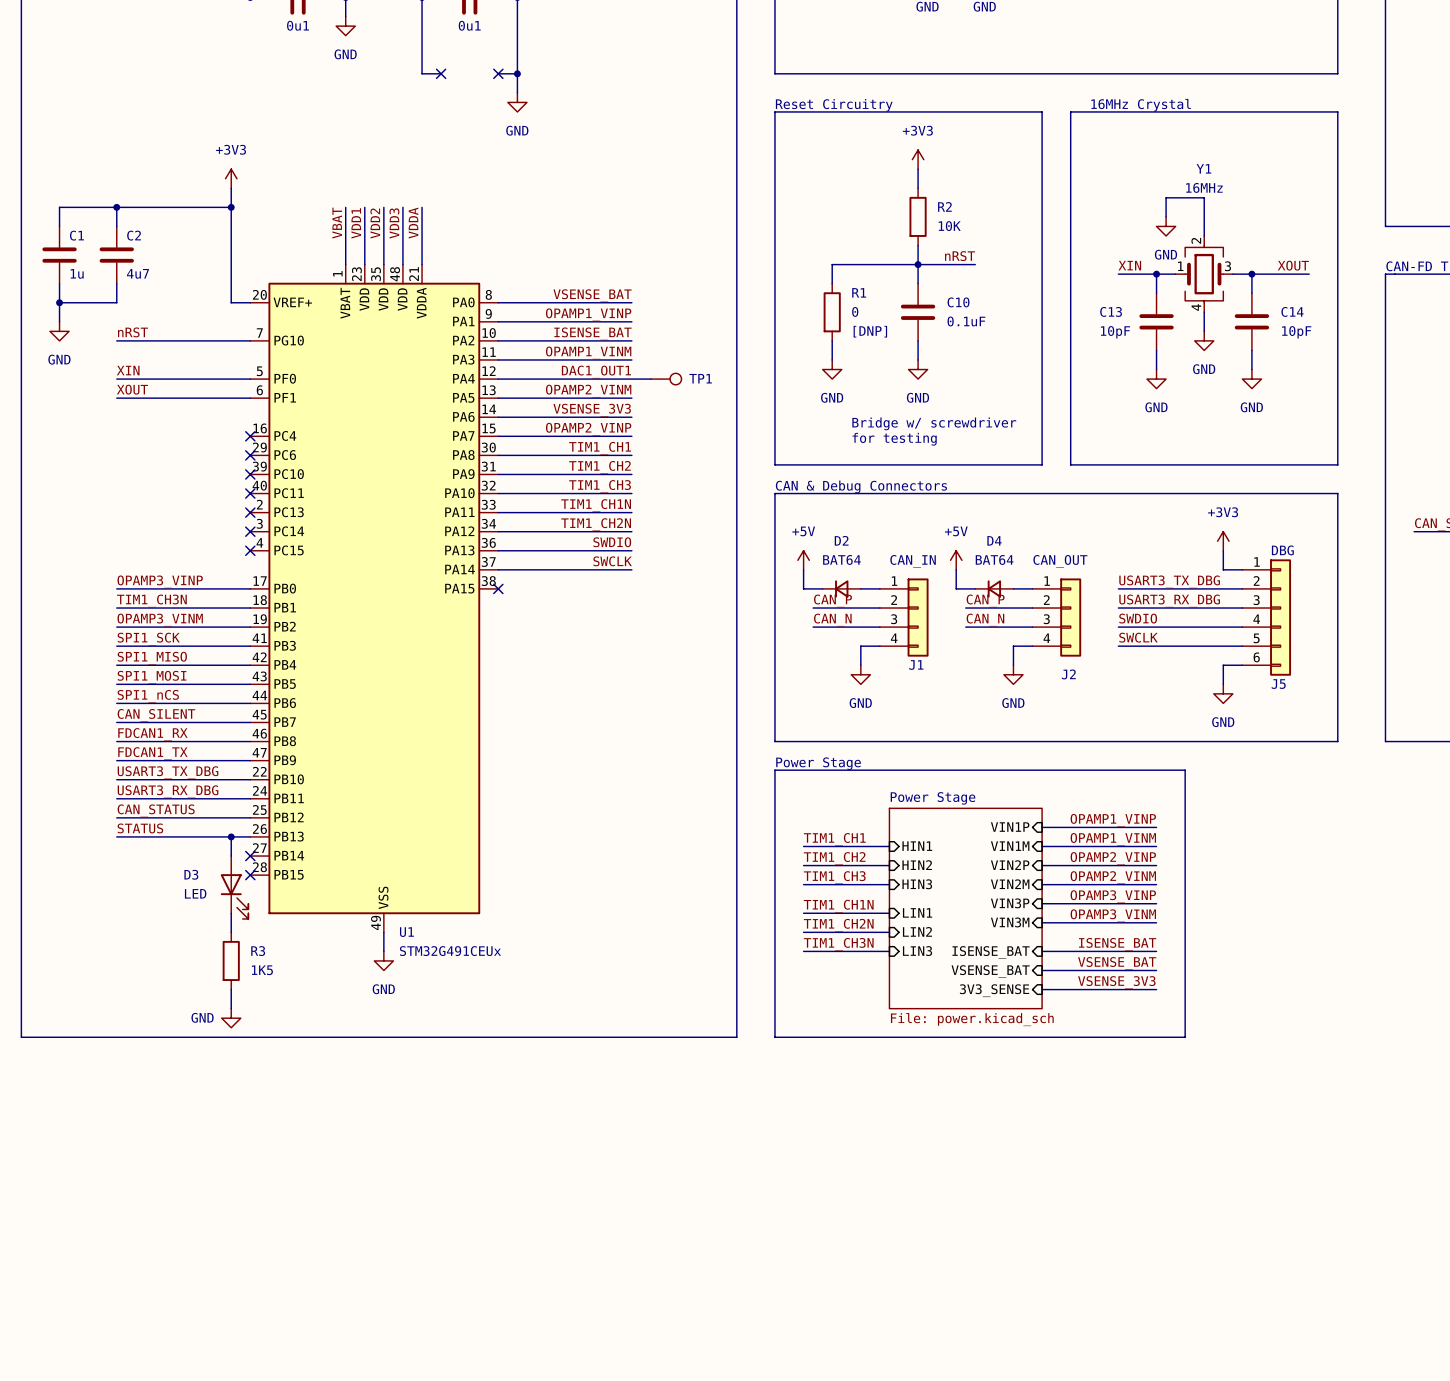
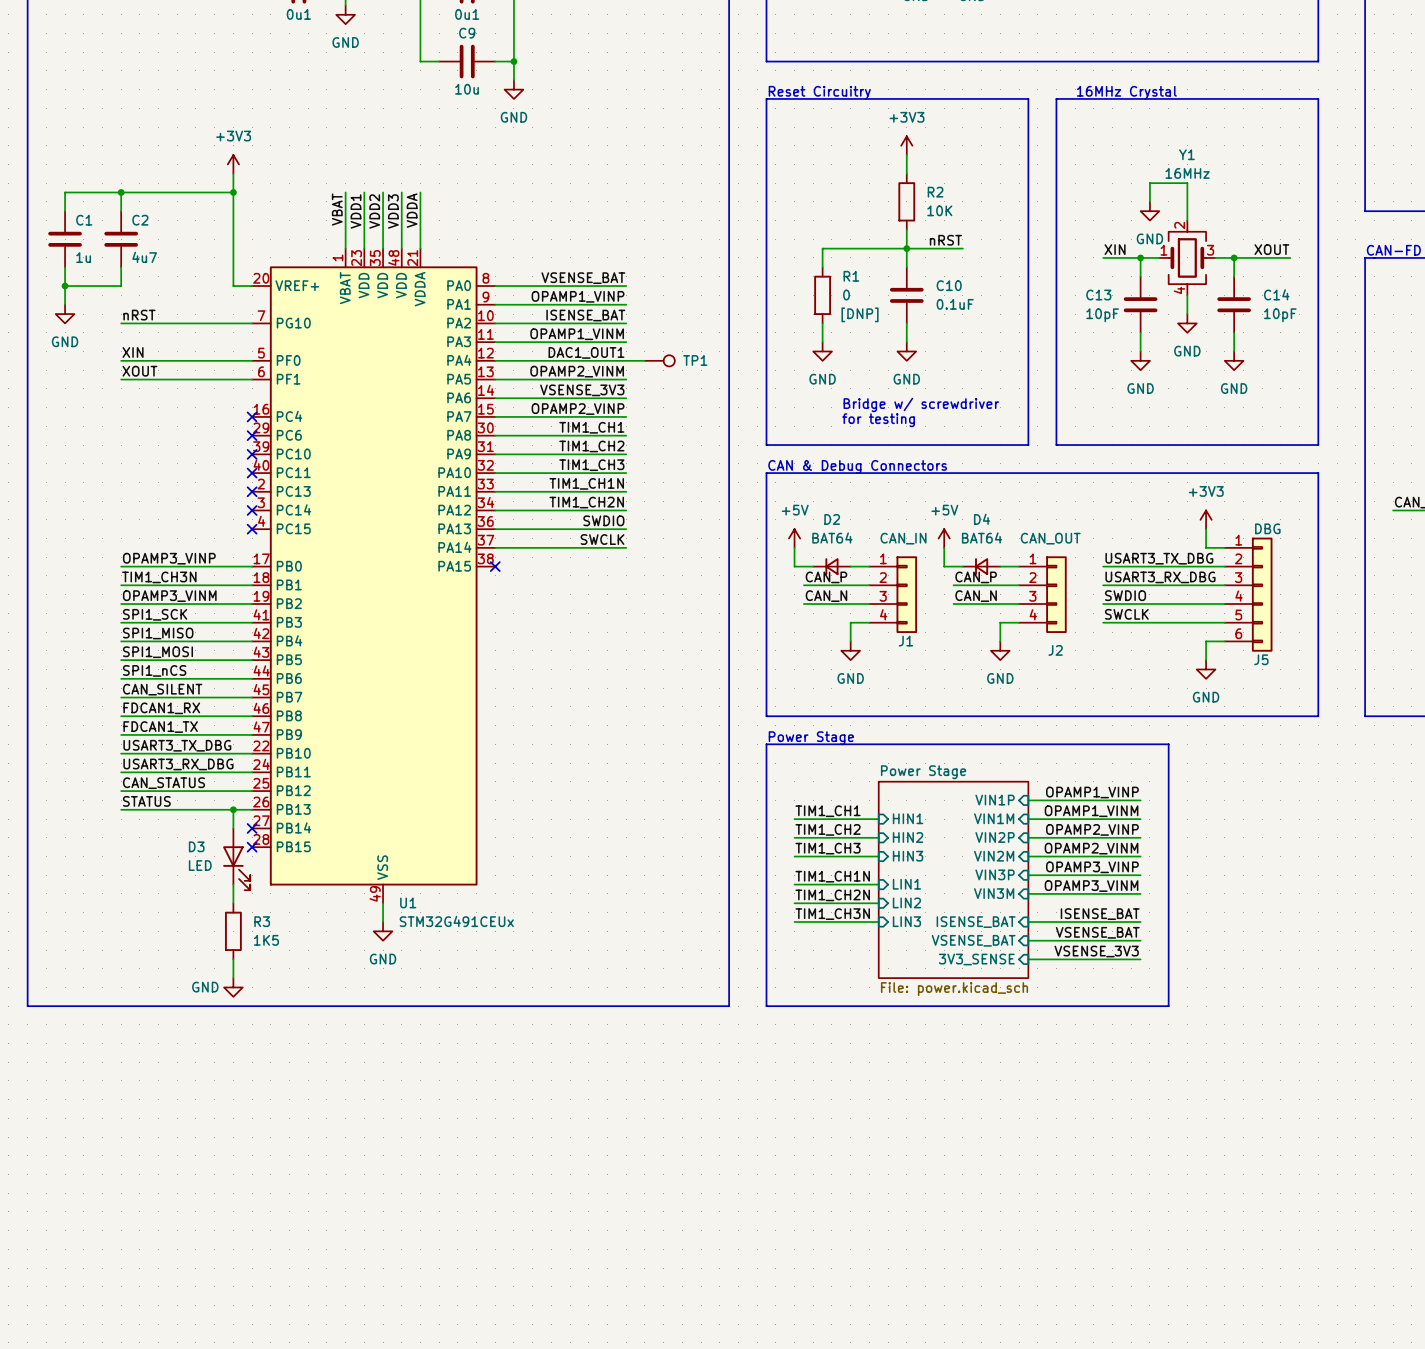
no-connect mark: (441, 73) -> none
C9: none -> 10u (467, 61)
no-connect mark: (498, 73) -> none

